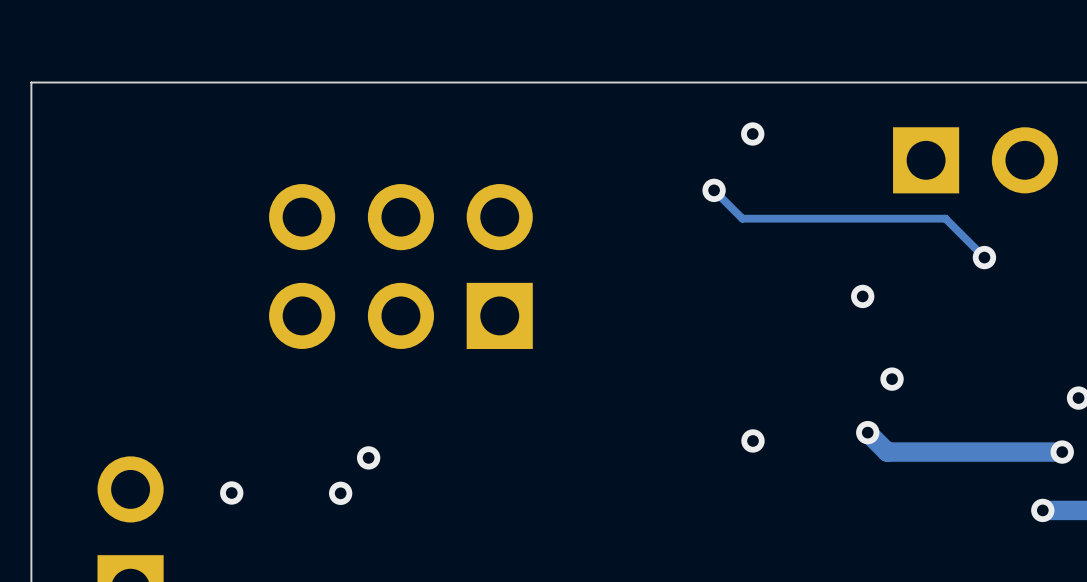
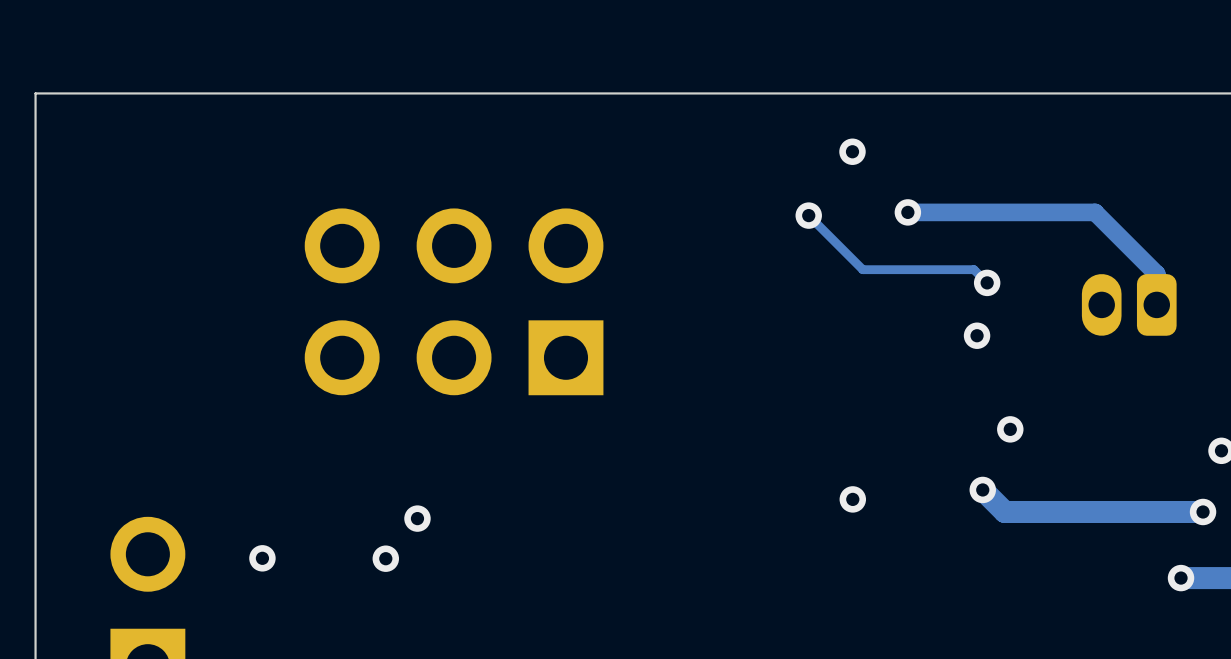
part: (975, 160) -> none
track: none -> (907, 212) (1095, 212) (1156, 274) (1156, 304)
via: none -> (907, 212)
track: (742, 218) (945, 218) (984, 257) -> (840, 247) (862, 269) (973, 269) (987, 282)
via: none -> (987, 282)
via: (984, 257) -> none
part: none -> (1129, 304)

